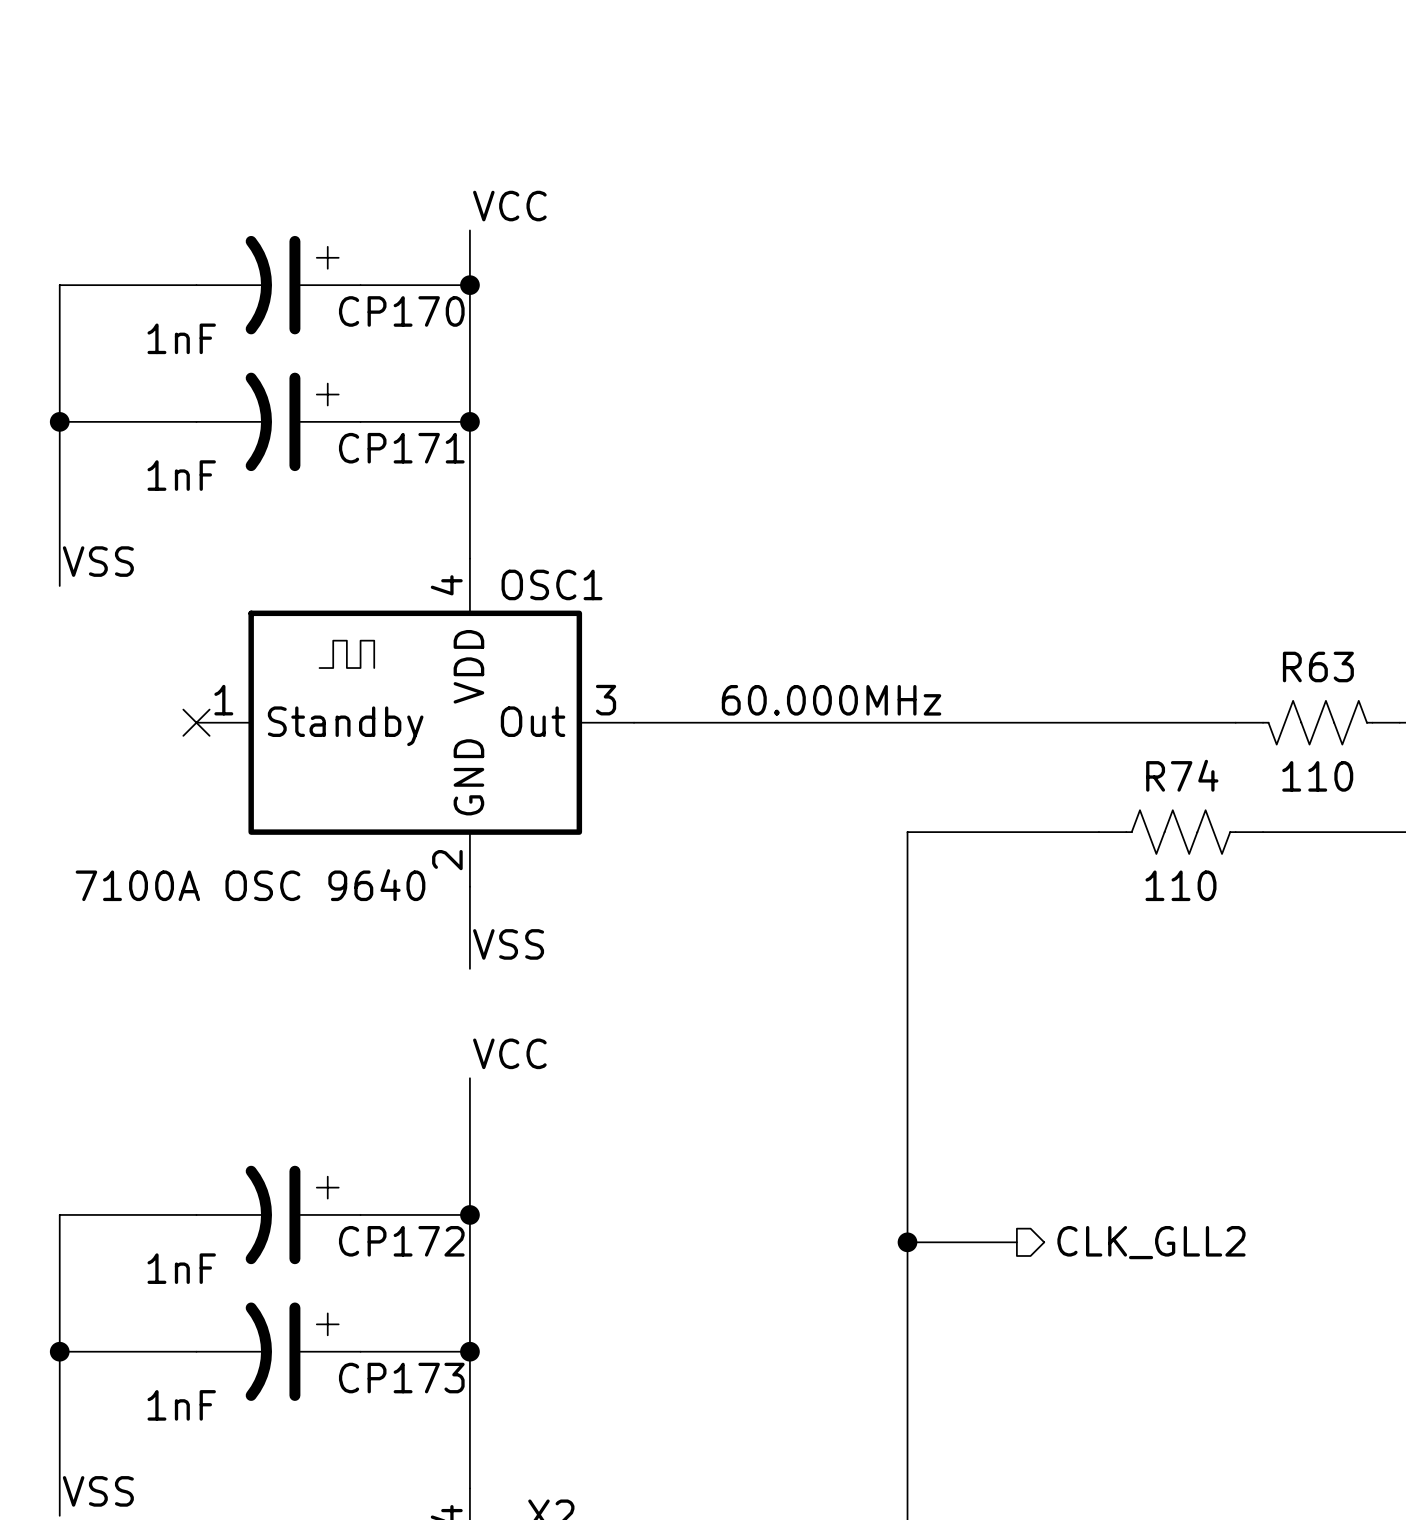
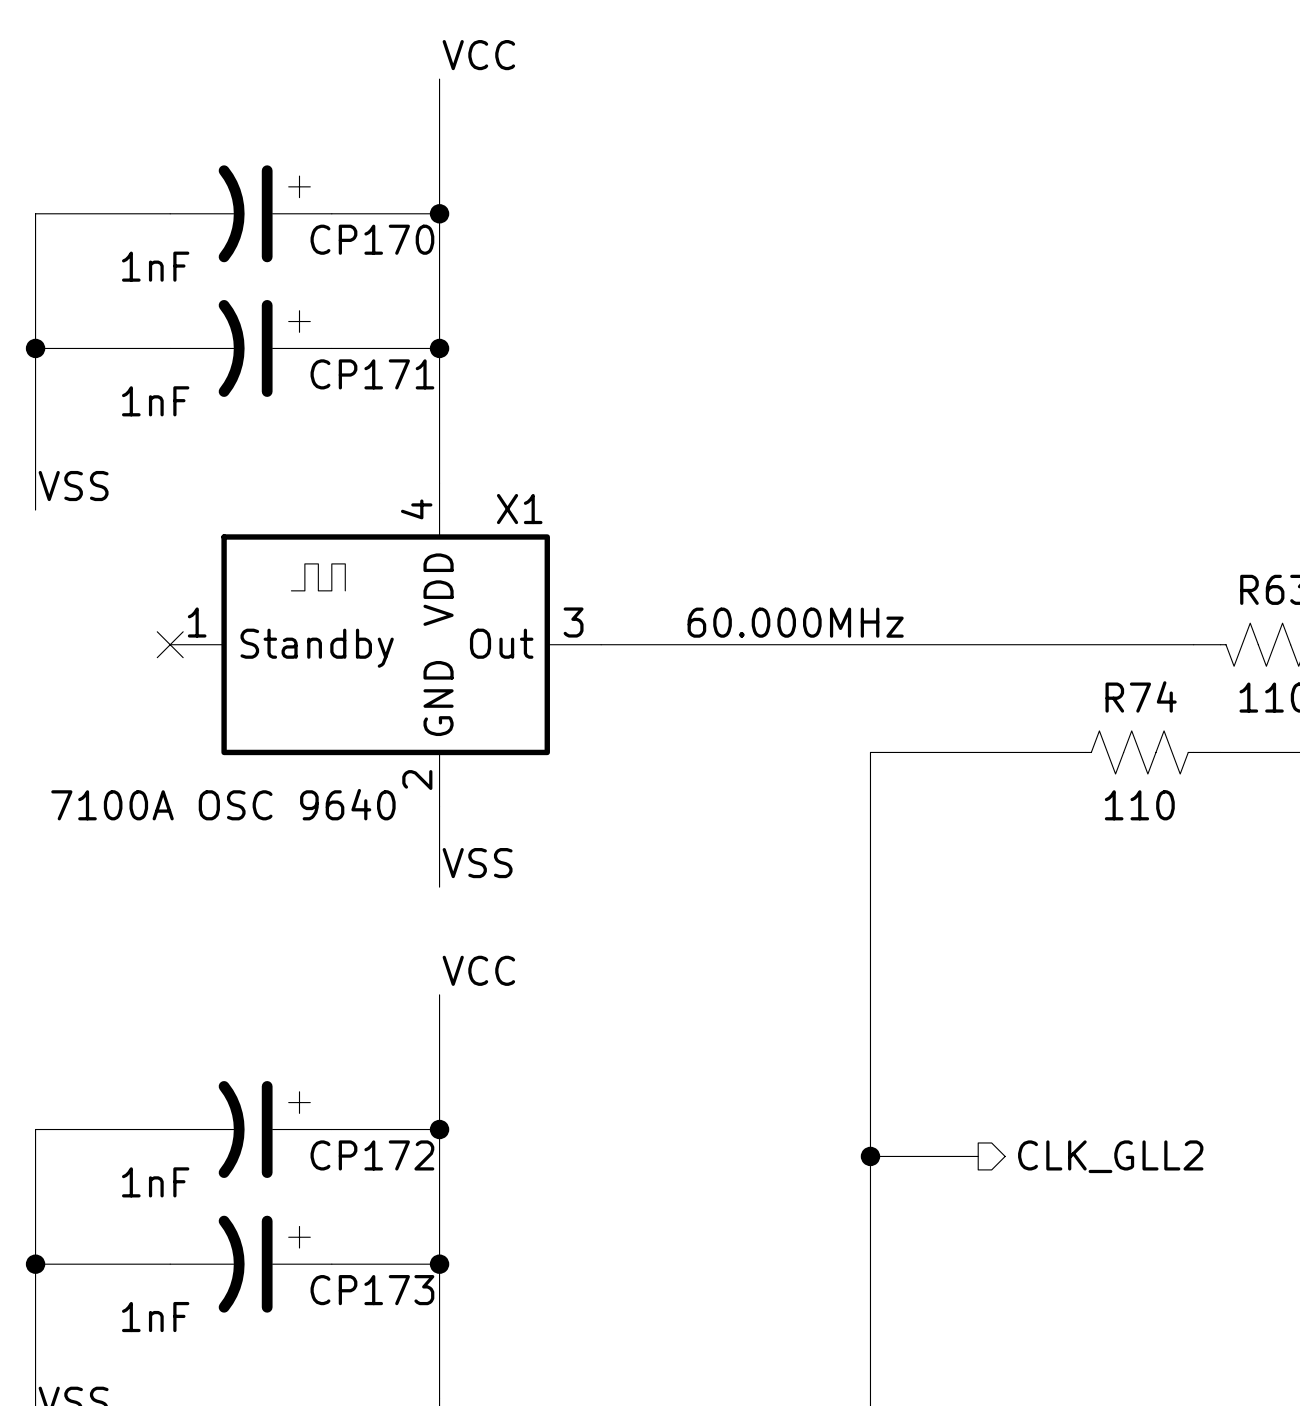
wire: none -> (439, 79) (439, 159)
label position: VCC (509, 206) -> VCC (478, 55)
OSC1 name: OSC1 (551, 584) -> X1 (519, 509)

